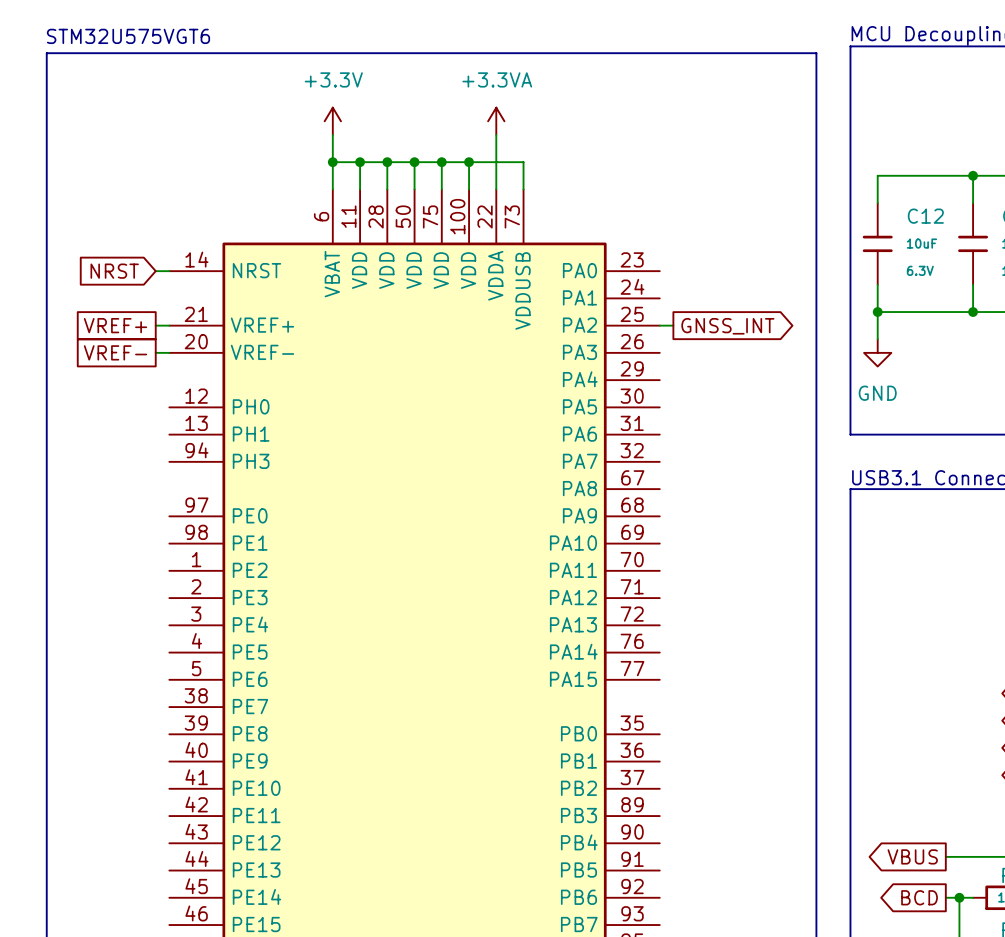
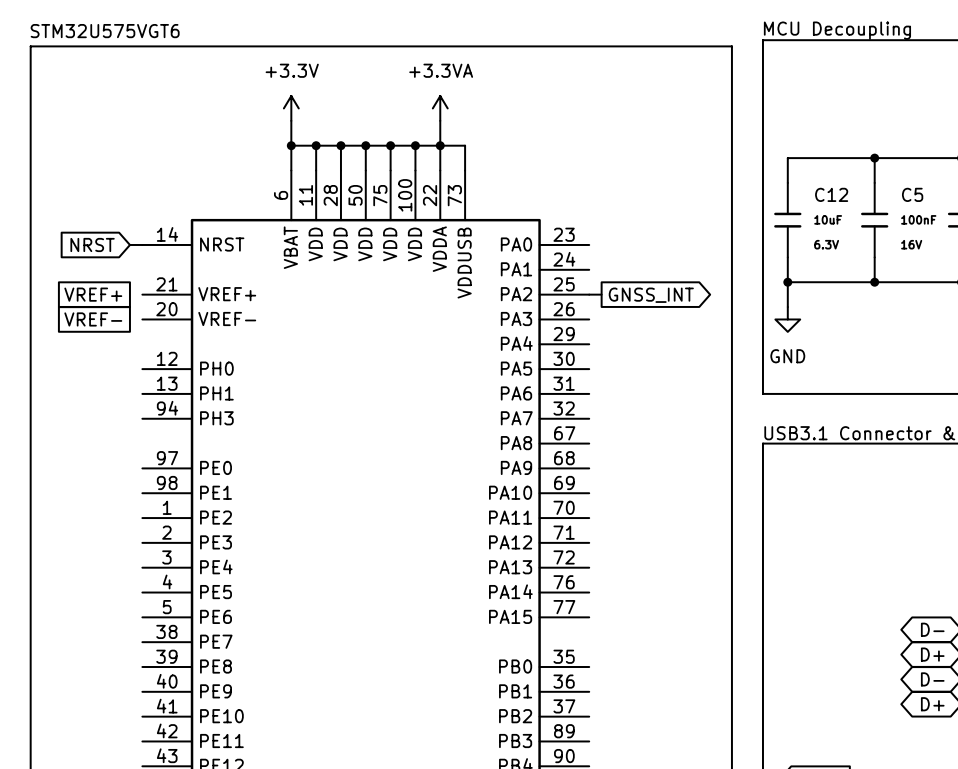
junction: none -> (440, 145)
wire: (155, 325) (169, 325) -> none
wire: (155, 352) (169, 352) -> none

